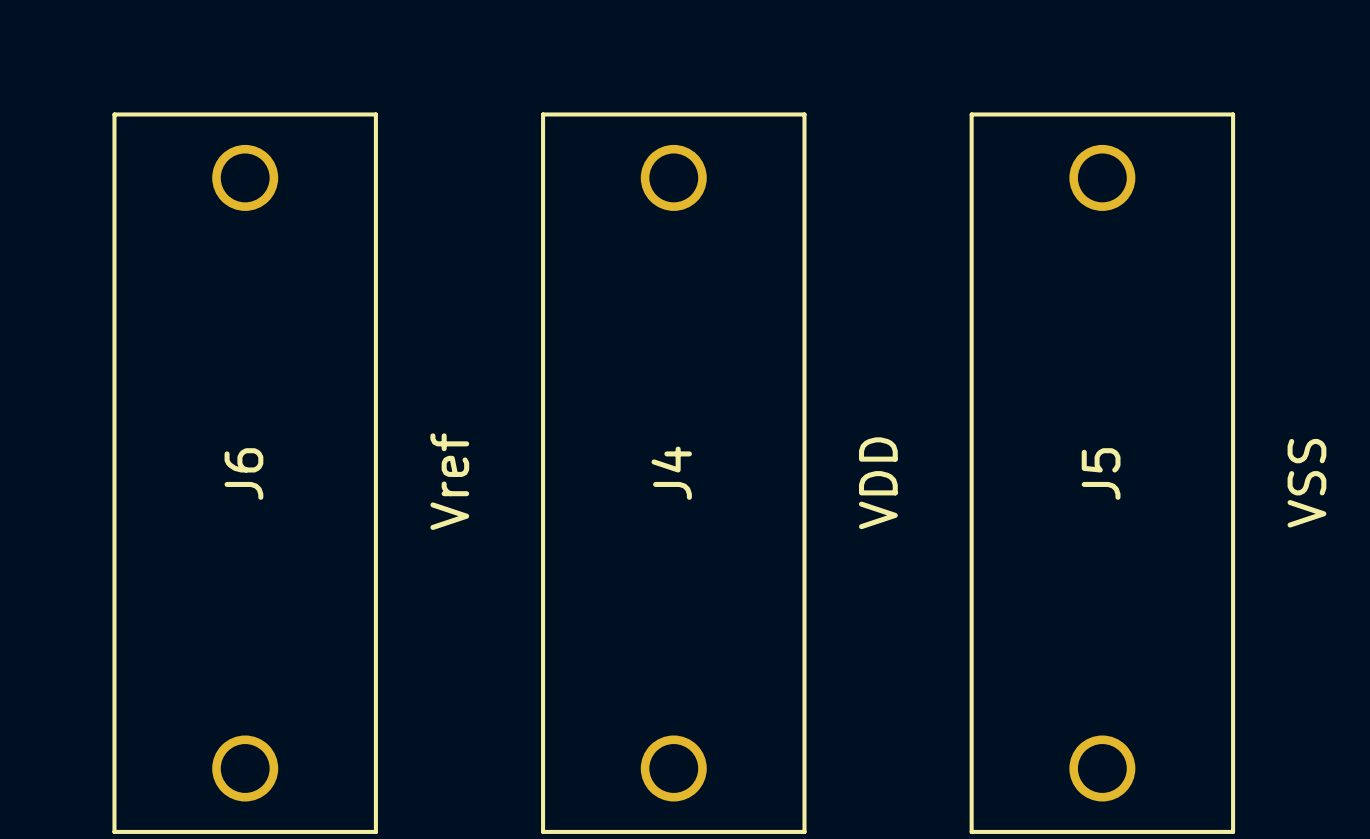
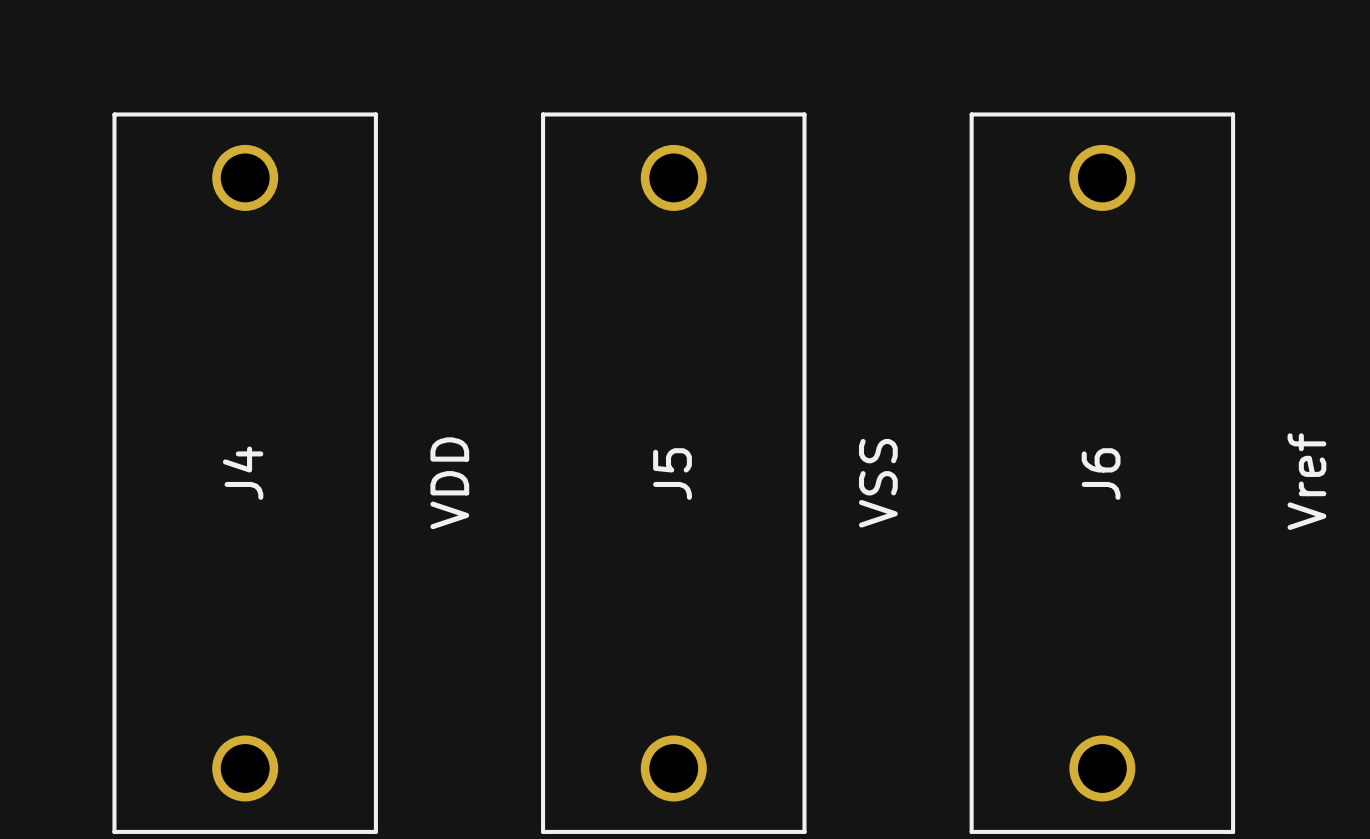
J4 name: J4 (671, 473) -> J5 (672, 474)
J6 name: J6 (243, 474) -> J4 (243, 473)
J5 name: J5 (1101, 474) -> J6 (1101, 474)
J6 value: Vref (449, 481) -> VDD (449, 483)
J4 value: VDD (878, 483) -> VSS (878, 483)
J5 value: VSS (1306, 483) -> Vref (1306, 481)

